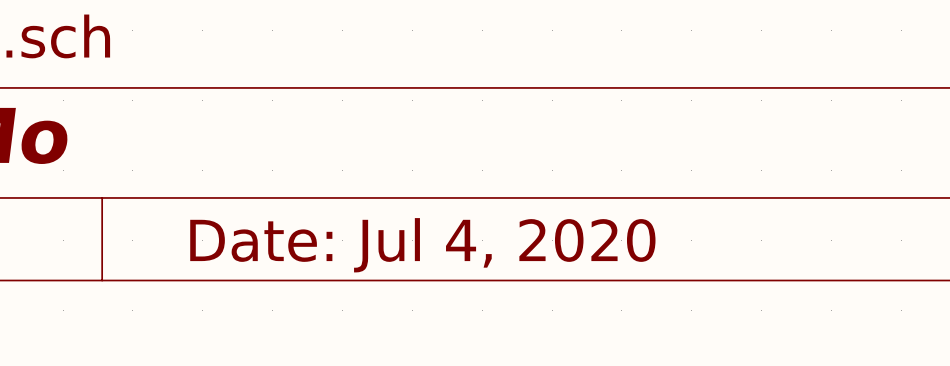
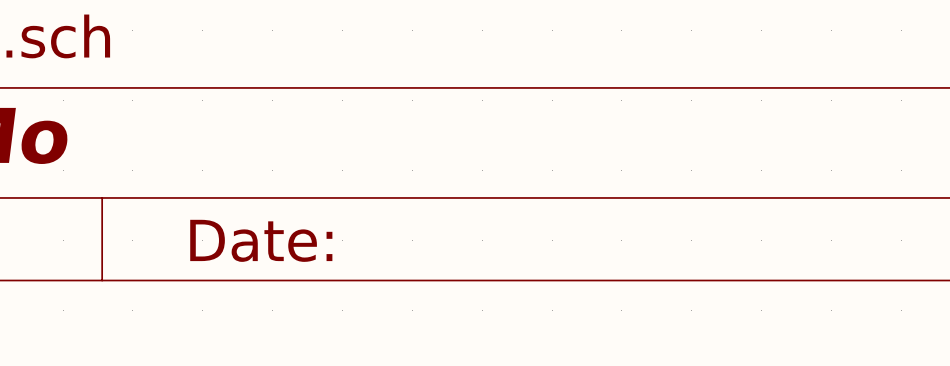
title block: Date: Jul 4, 2020 (422, 245) -> Date: (261, 240)

